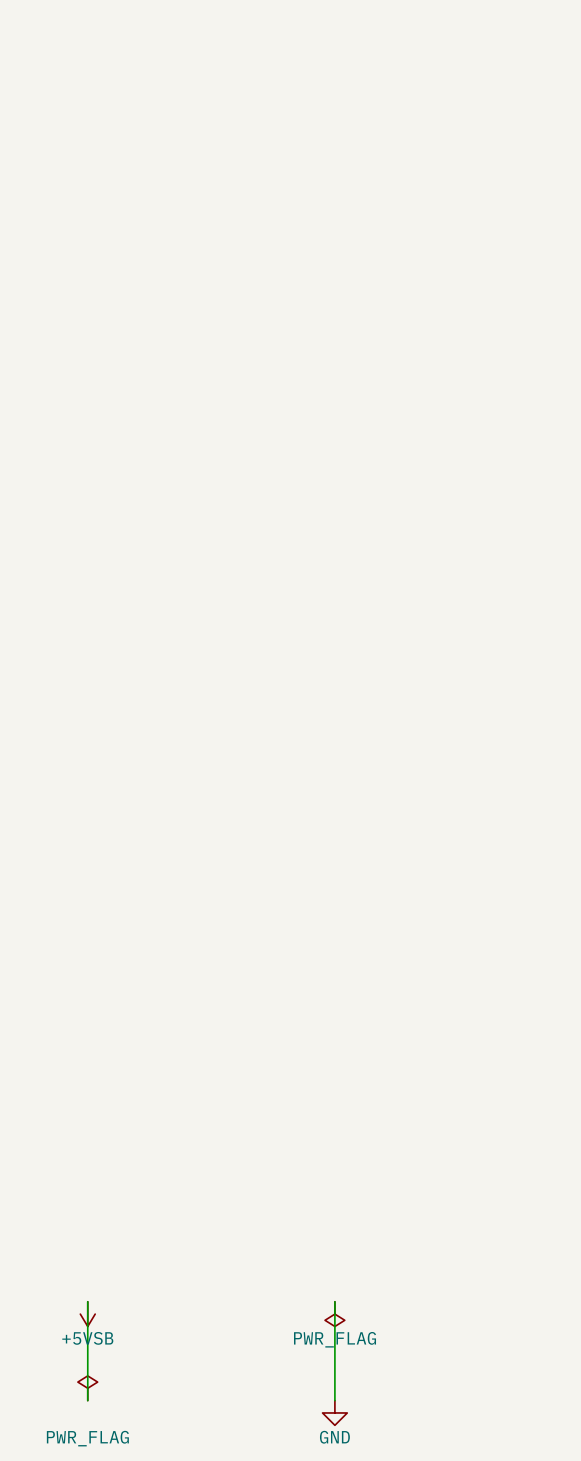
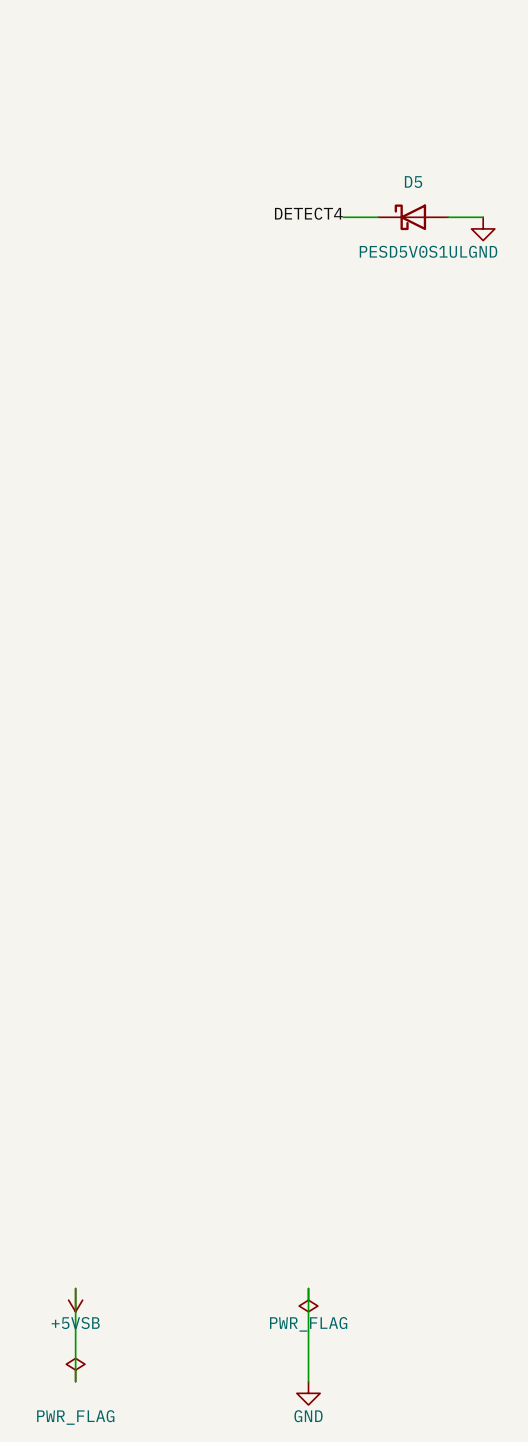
label: none -> DETECT4 (308, 213)
wire: none -> (343, 217) (378, 217)
D5: none -> PESD5V0S1UL (413, 217)
wire: none -> (448, 217) (483, 217)
power symbol: none -> GND (483, 228)

